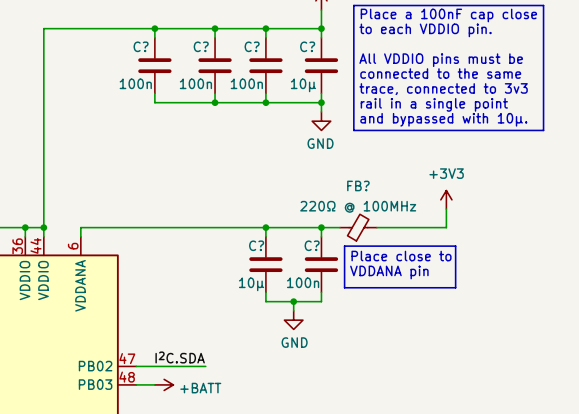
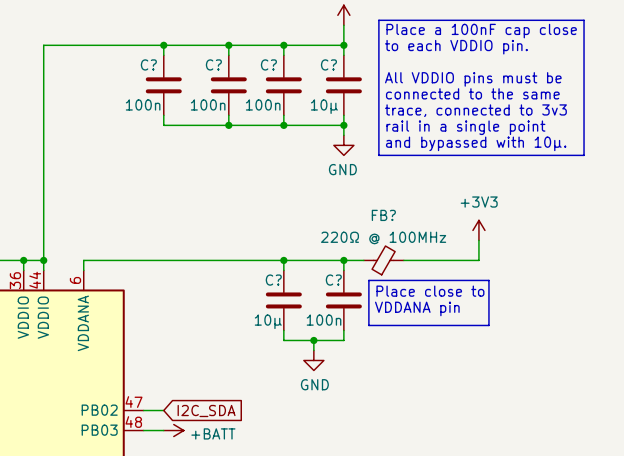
label: I2C.SDA (180, 357) -> none
wire: (154, 366) (205, 366) -> none
global label: none -> I2C_SDA (206, 410)

